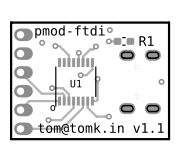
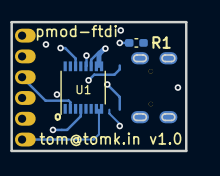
track: none -> (104, 48) (98, 54) (98, 65)
track: (92, 62) (92, 69) (86, 75) (80, 75) -> (119, 65) (119, 69) (114, 74) (94, 74) (88, 80)
track: (97, 78) (97, 99) (92, 101) -> (107, 84) (119, 96) (119, 109)
track: (52, 88) (62, 88) (68, 94) (68, 101) -> none
track: (59, 101) (29, 101) (20, 110) -> none
track: (83, 101) (83, 107) (61, 128) -> (98, 109) (98, 134) (93, 139) (67, 139)
track: (87, 101) (87, 107) (96, 116) (108, 116) -> none
track: none -> (109, 109) (109, 113) (119, 123)
text: tom@tomk.in v1.1 (100, 128) -> tom@tomk.in v1.0 (110, 139)

